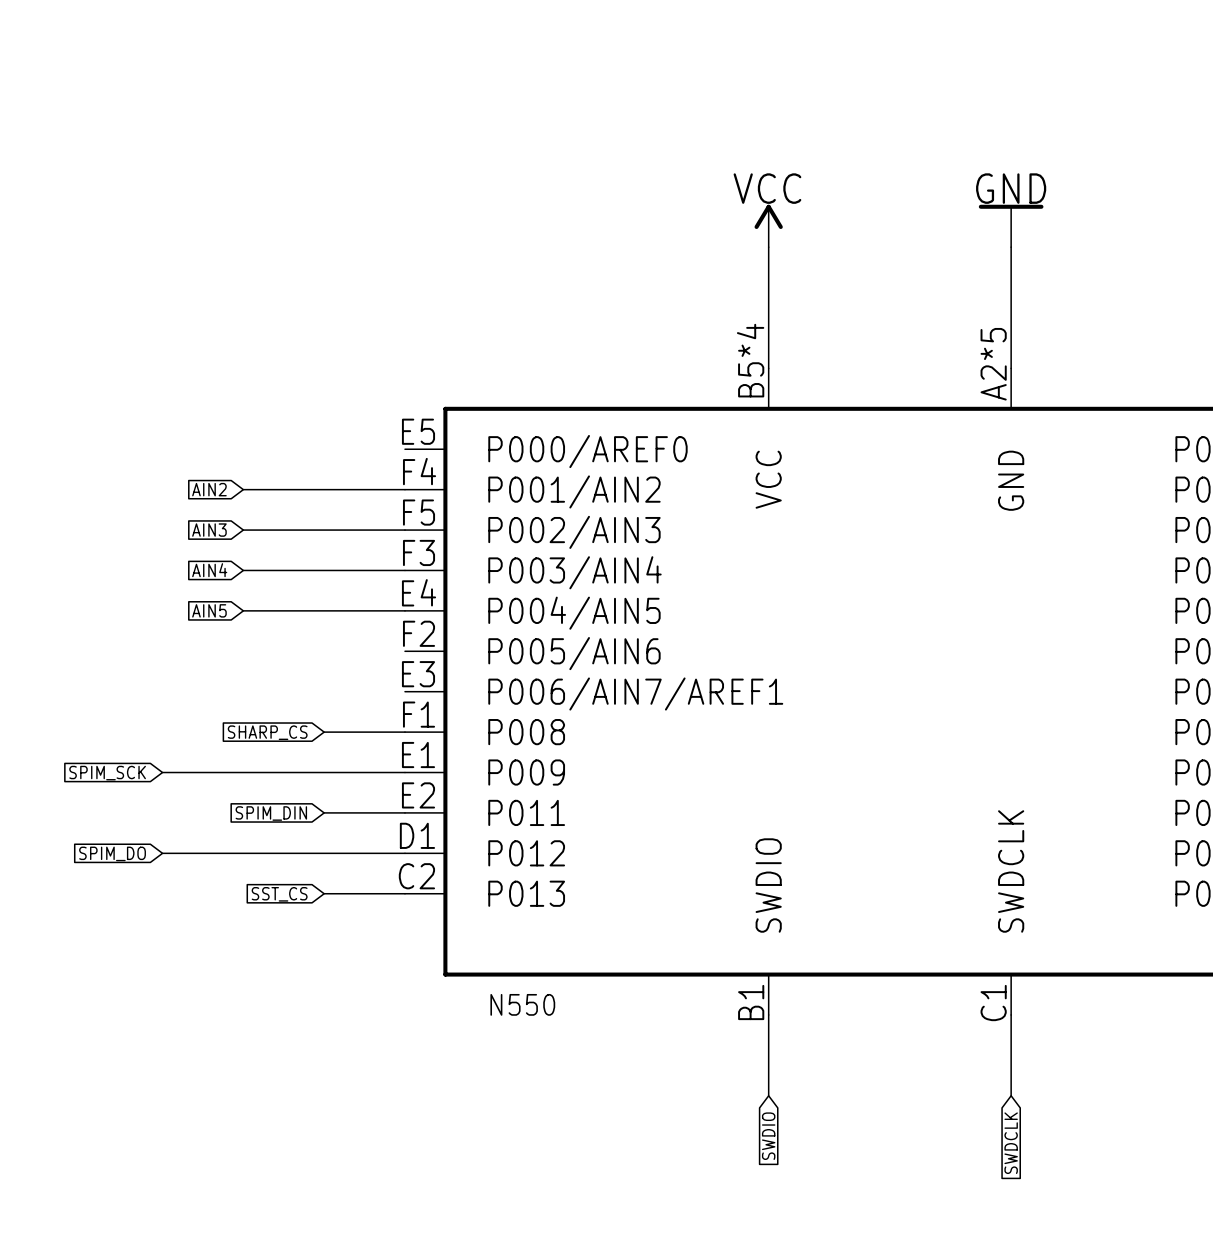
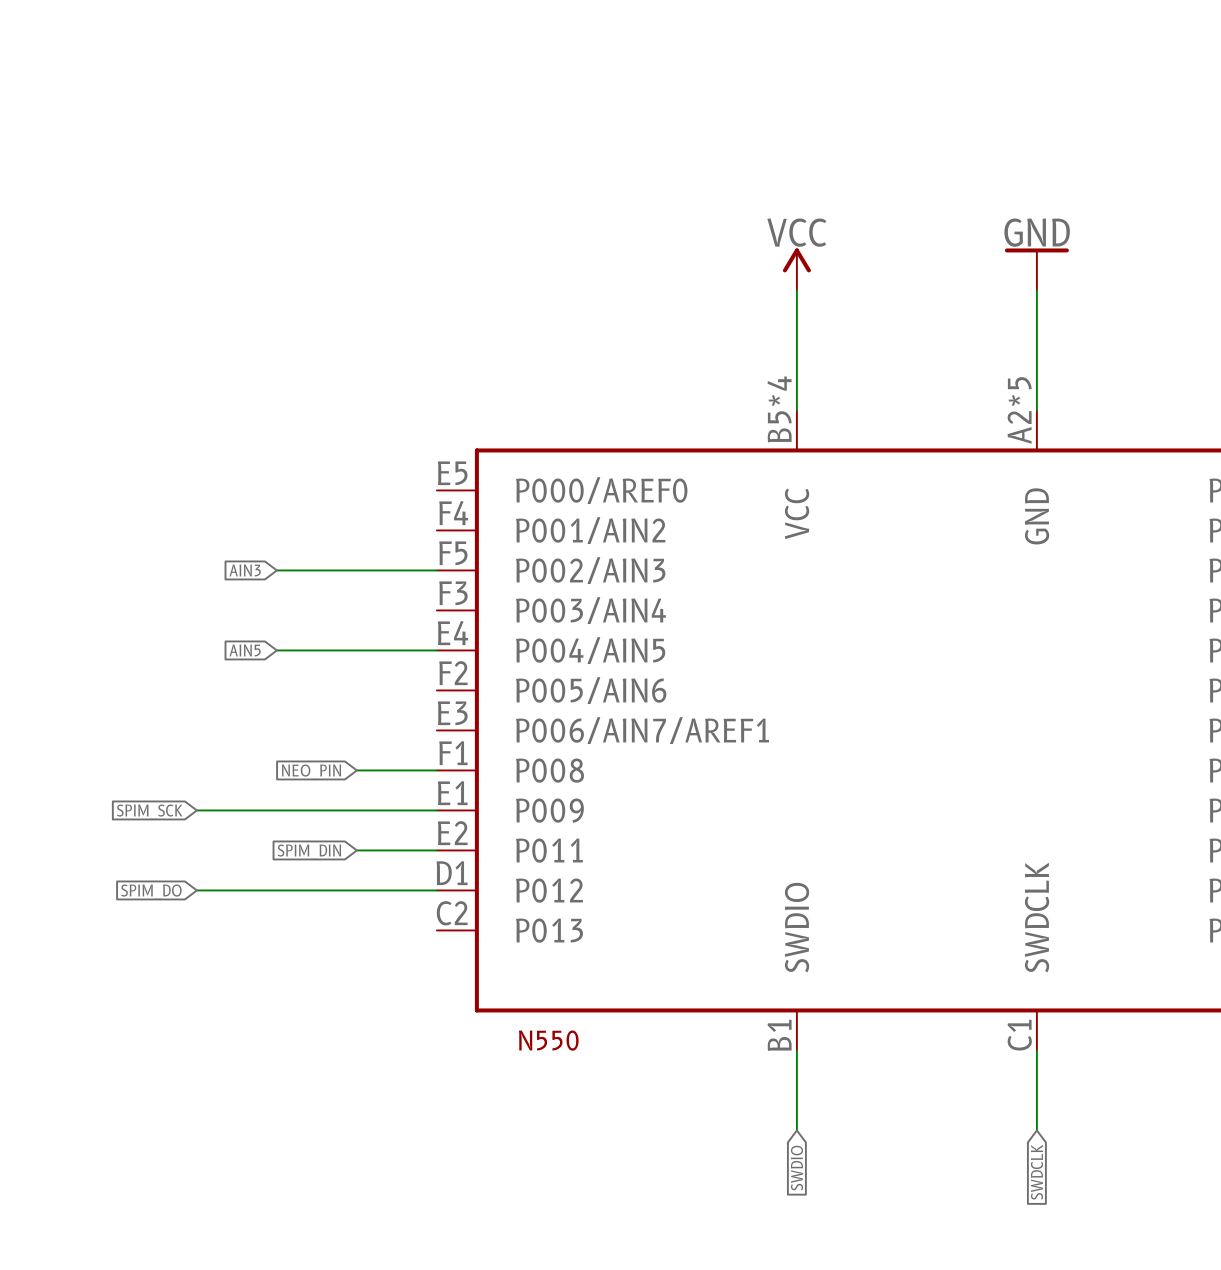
global label: AIN2 (209, 489) -> none
wire: (243, 489) (404, 489) -> none
global label: AIN4 (209, 570) -> none
wire: (243, 570) (404, 570) -> none
global label: SHARP_CS (267, 732) -> NEO_PIN (311, 772)
wire: (324, 893) (404, 893) -> none
global label: SST_CS (279, 894) -> none

